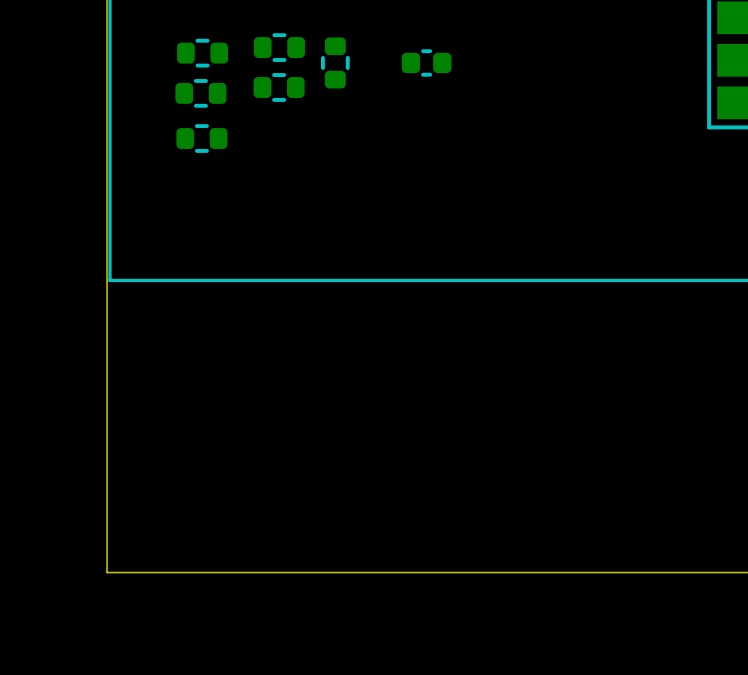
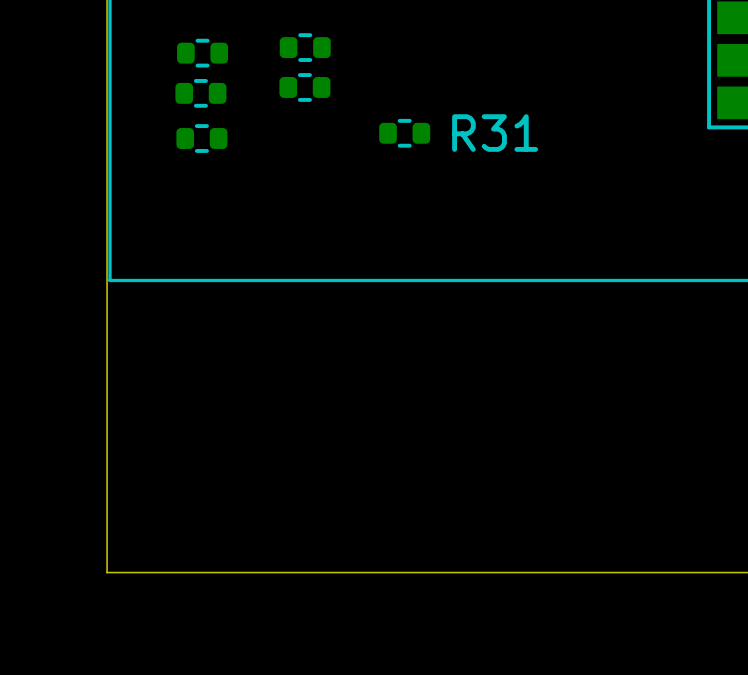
part: (279, 47) -> none
part: none -> (305, 47)
part: (335, 62) -> none
part: (426, 62) -> none
part: (279, 87) -> none
part: none -> (304, 87)
R31: none -> (404, 133)

